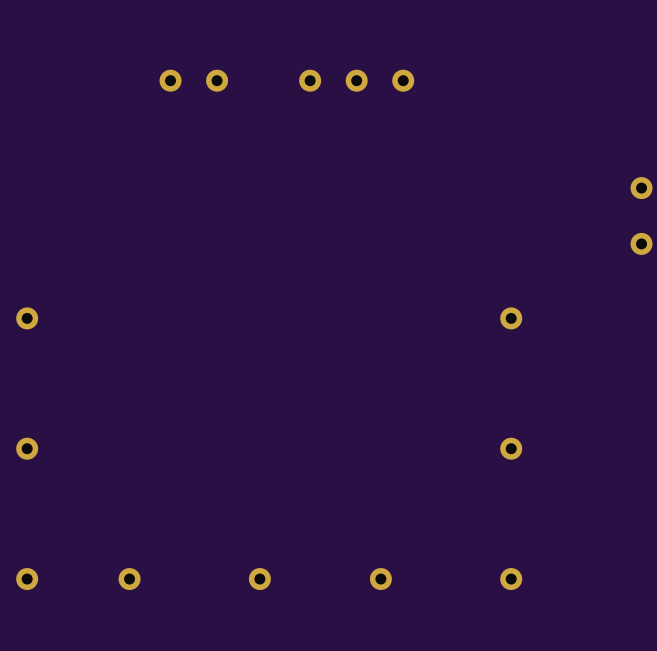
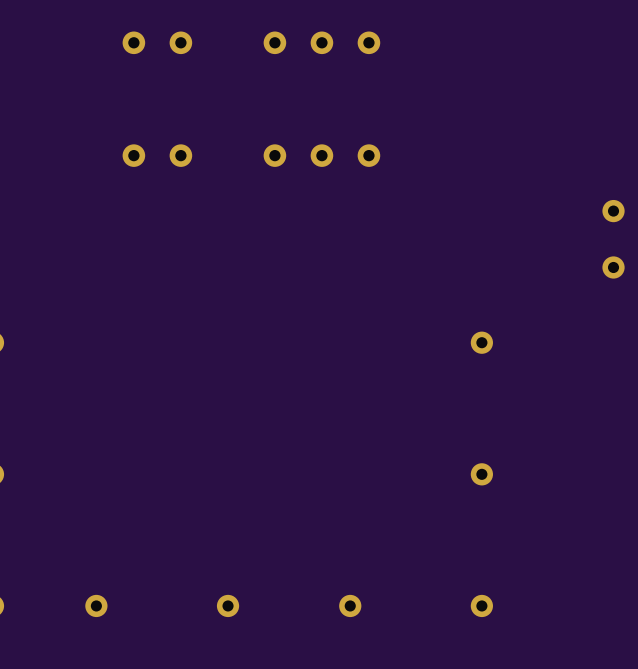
via: none -> (133, 42)
via: none -> (180, 42)
via: none -> (274, 42)
via: none -> (321, 42)
via: none -> (368, 42)
via: (170, 80) -> none
via: (217, 80) -> none
via: (310, 80) -> none
via: (356, 80) -> none
via: (403, 80) -> none
via: none -> (133, 155)
via: none -> (180, 155)
via: none -> (274, 155)
via: none -> (321, 155)
via: none -> (368, 155)

